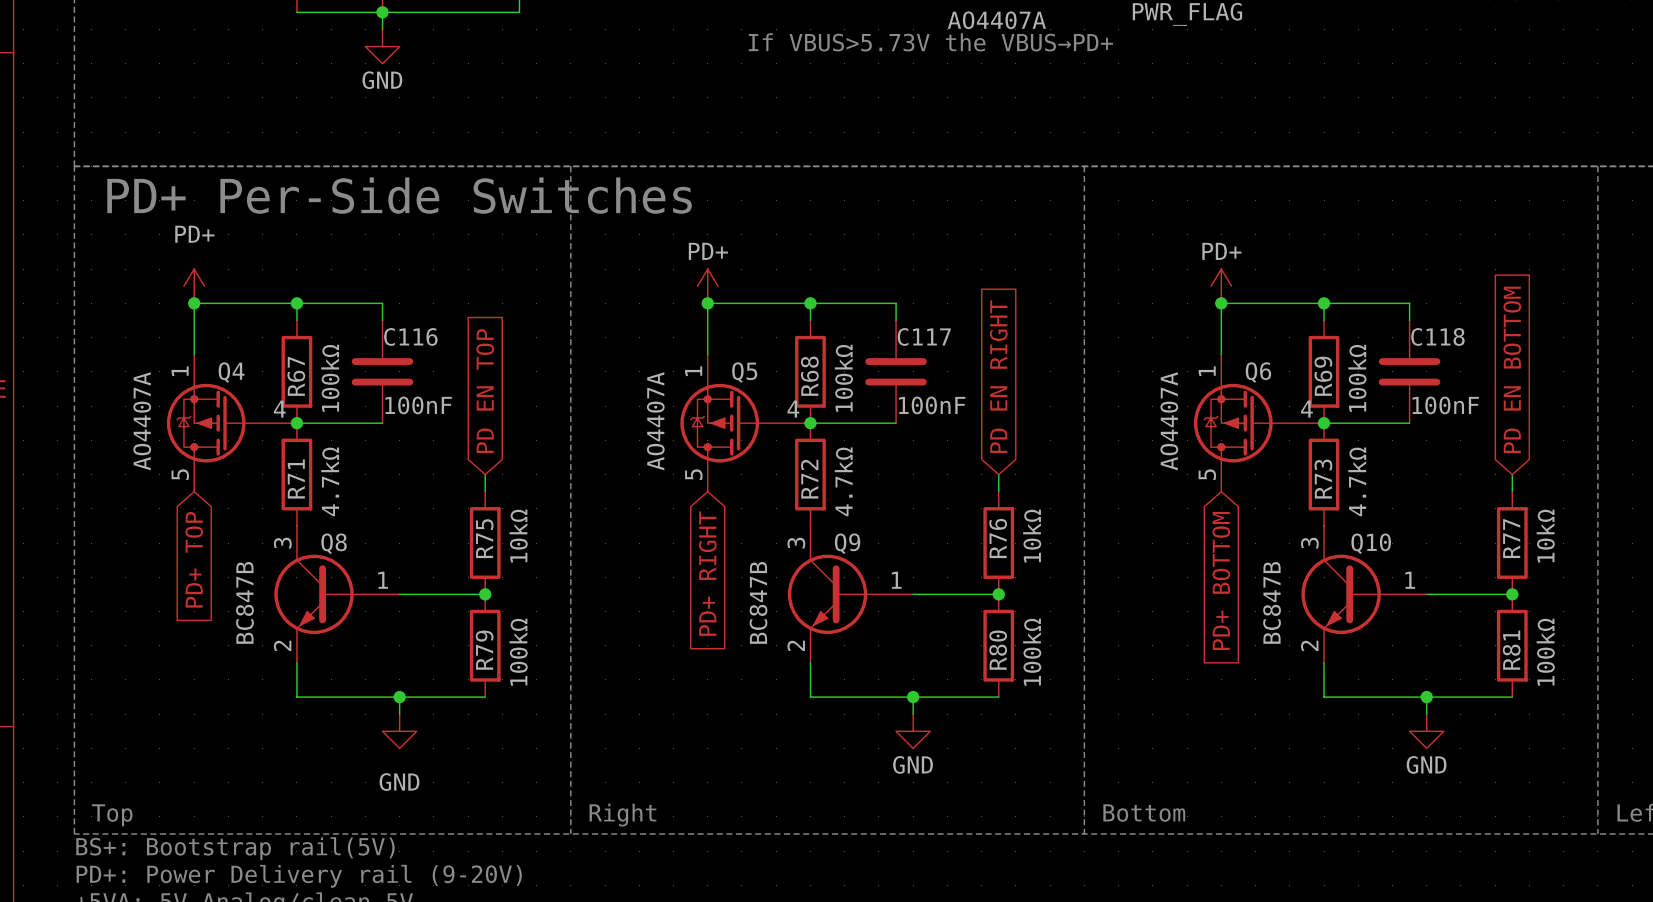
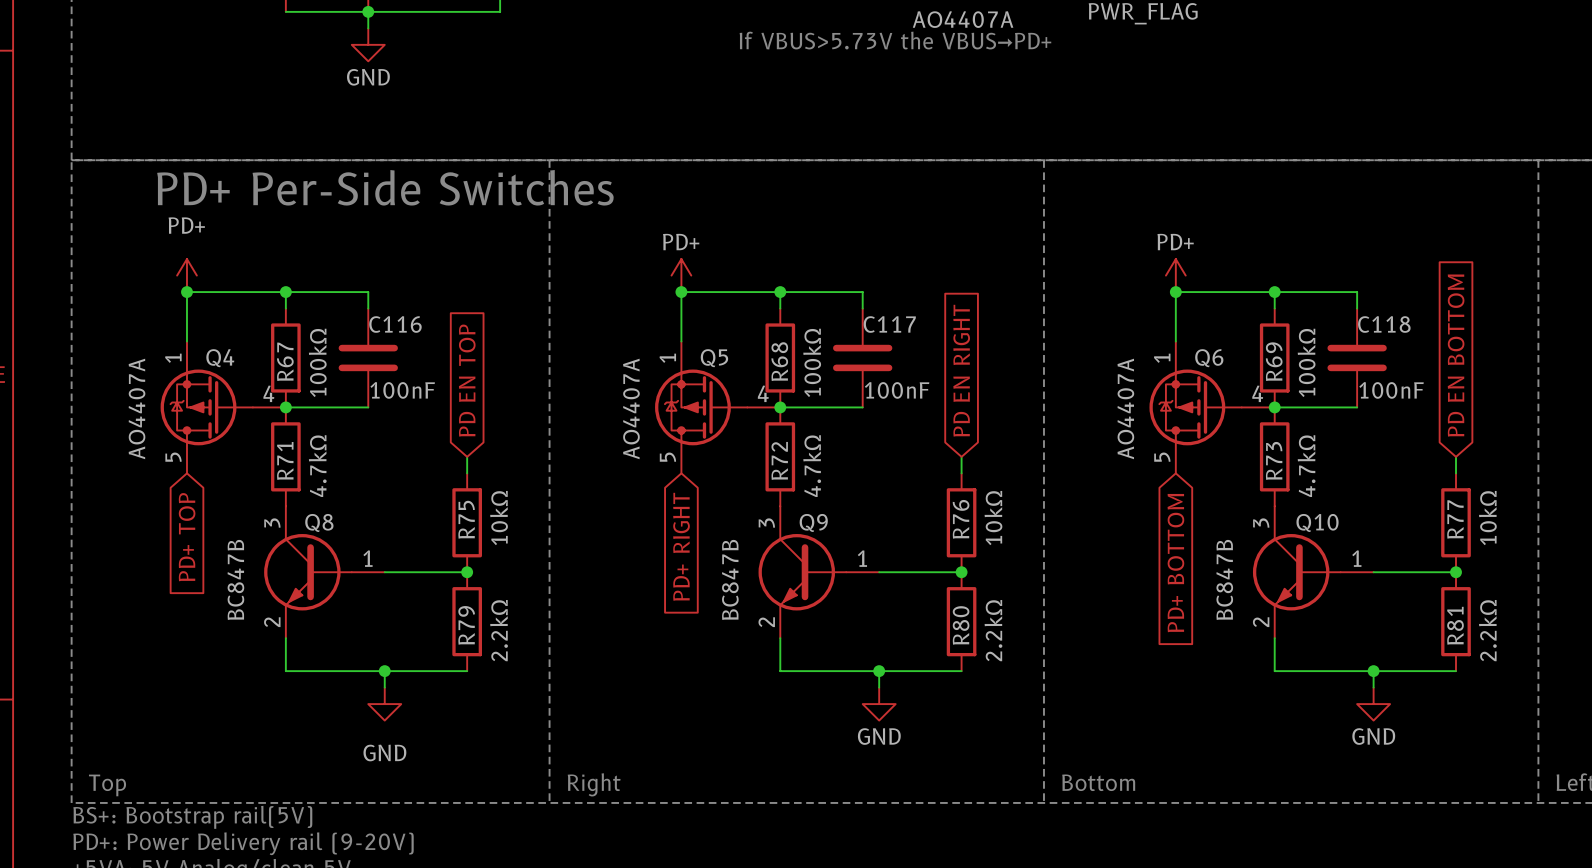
R79 value: 100kΩ (518, 652) -> 2.2kΩ (499, 630)
R80 value: 100kΩ (1032, 652) -> 2.2kΩ (993, 630)
R81 value: 100kΩ (1545, 652) -> 2.2kΩ (1487, 630)

